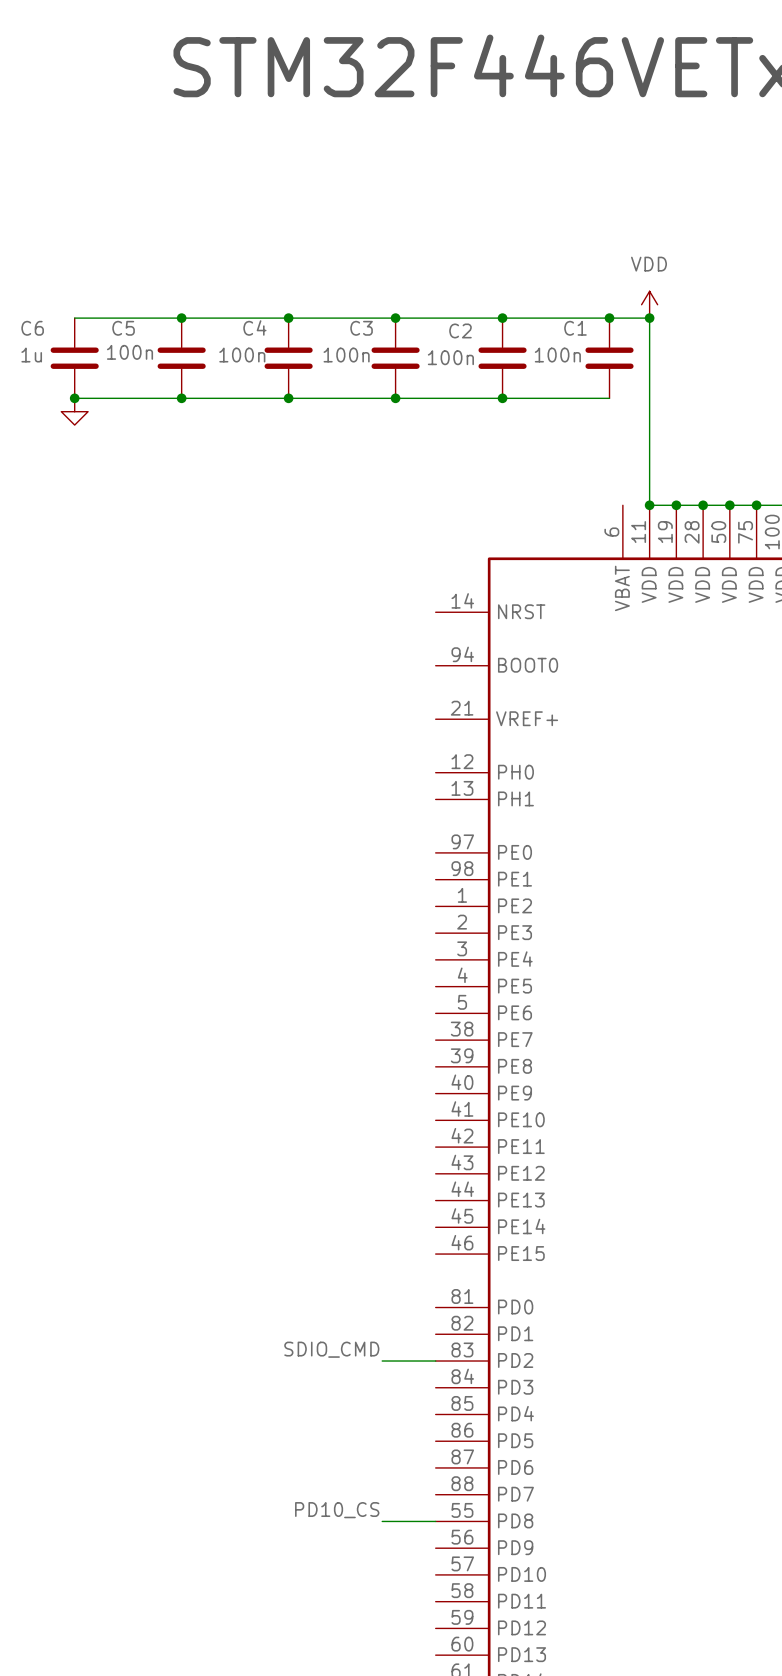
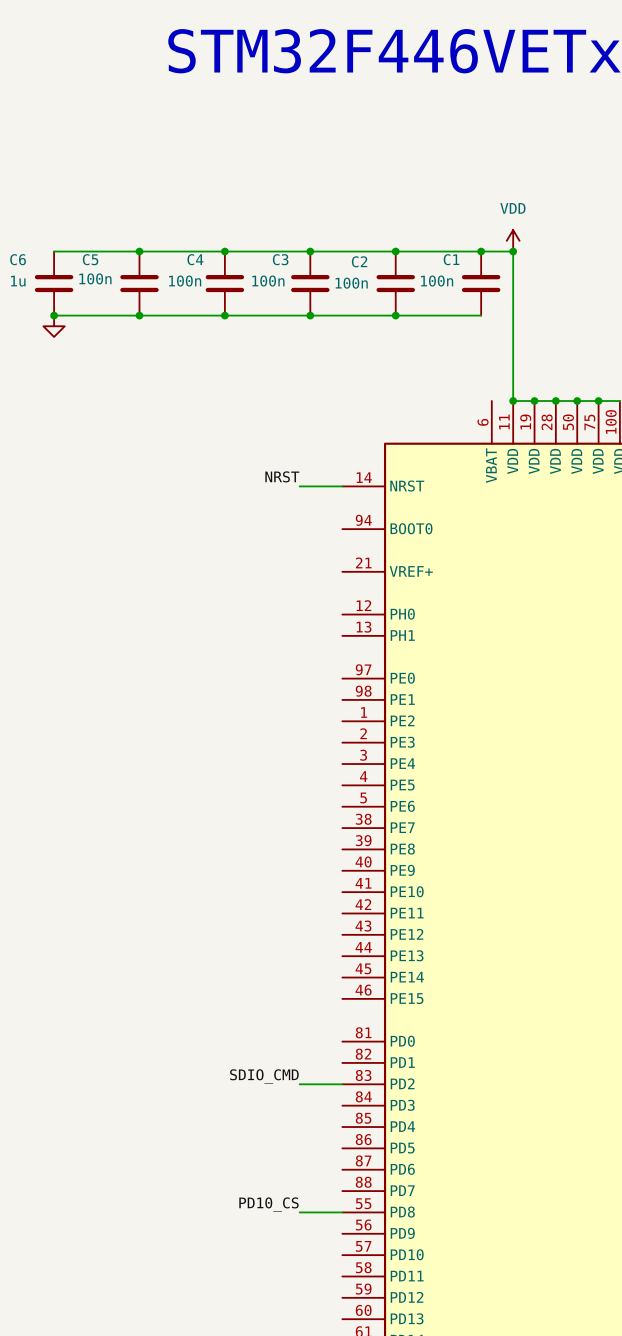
label: none -> NRST (282, 476)
wire: none -> (299, 486) (342, 486)

